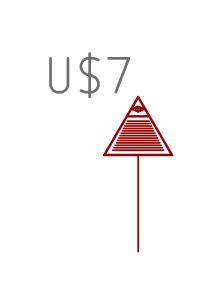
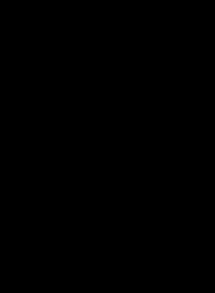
U$7: (138, 173) -> none

